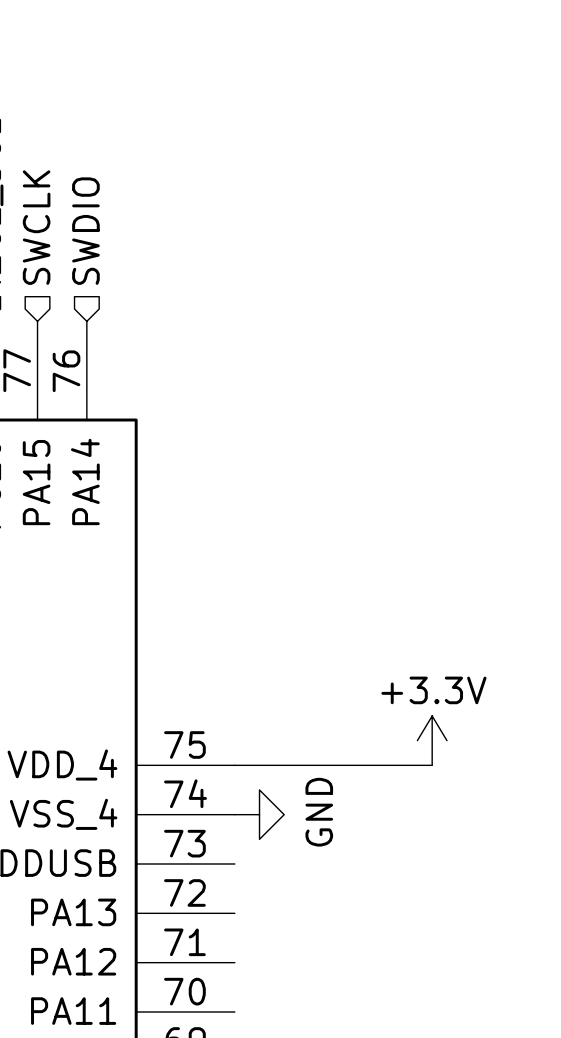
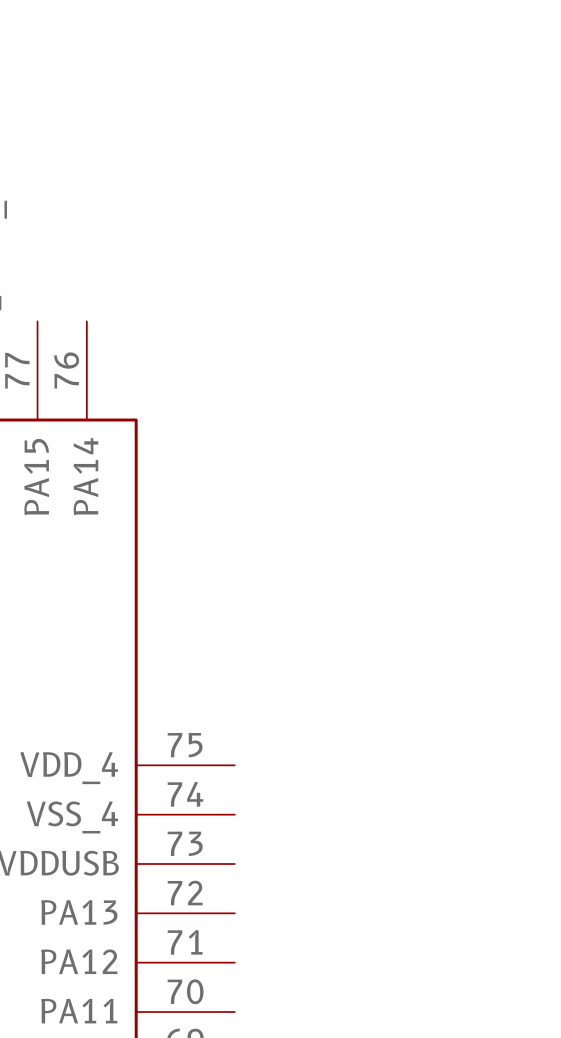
hierarchical label: SWCLK (36, 227) -> none
hierarchical label: SWDIO (85, 231) -> none
power symbol: +3.3V (432, 740) -> none
wire: (234, 765) (432, 765) -> none
power symbol: GND (259, 814) -> none

